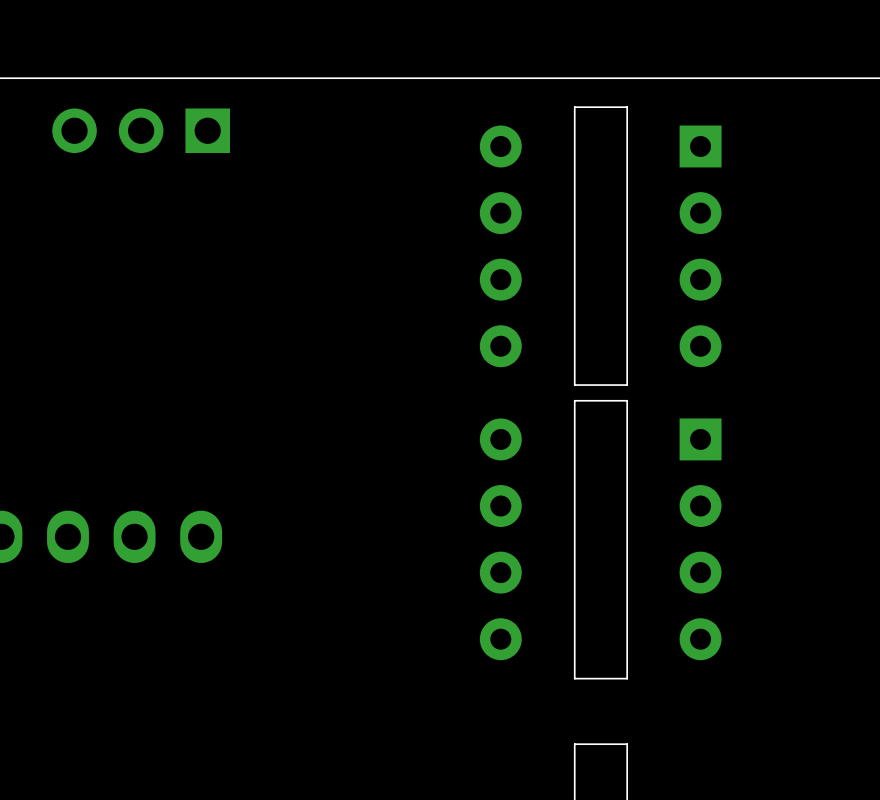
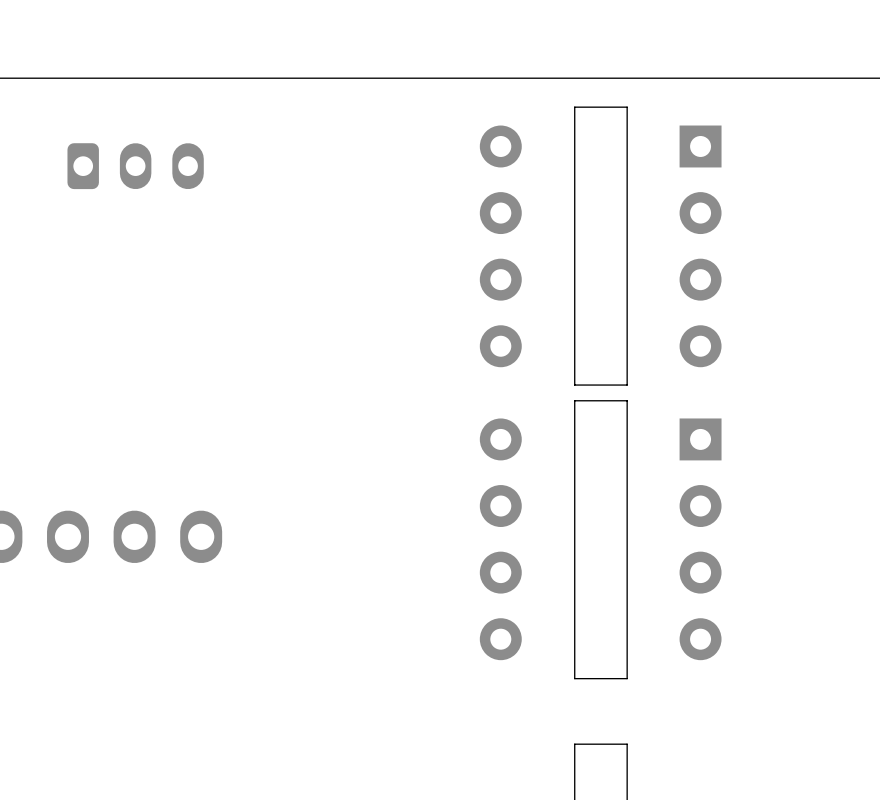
part: (141, 130) -> none
part: none -> (135, 166)

